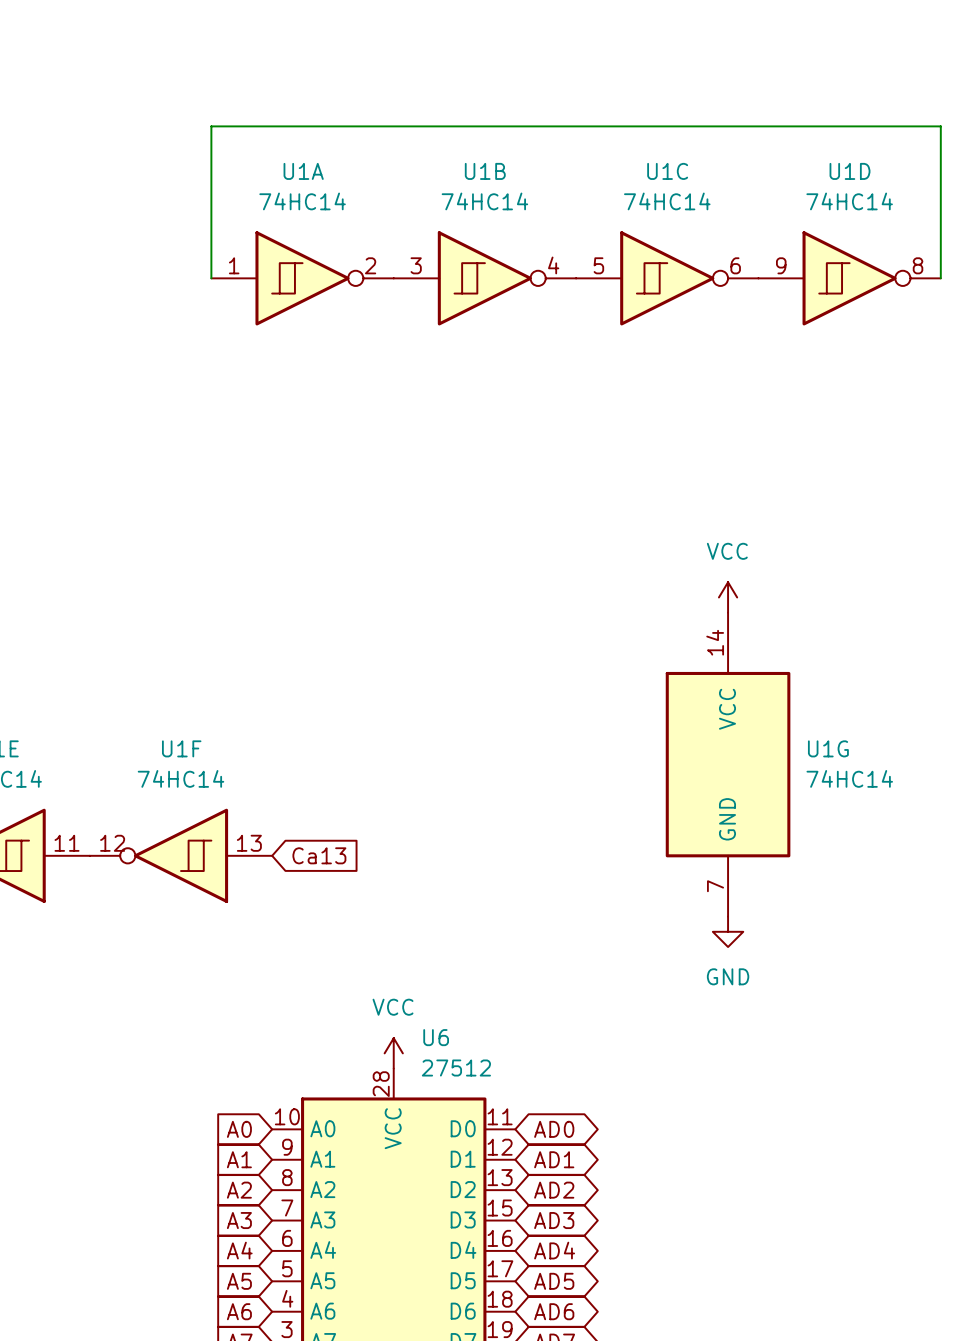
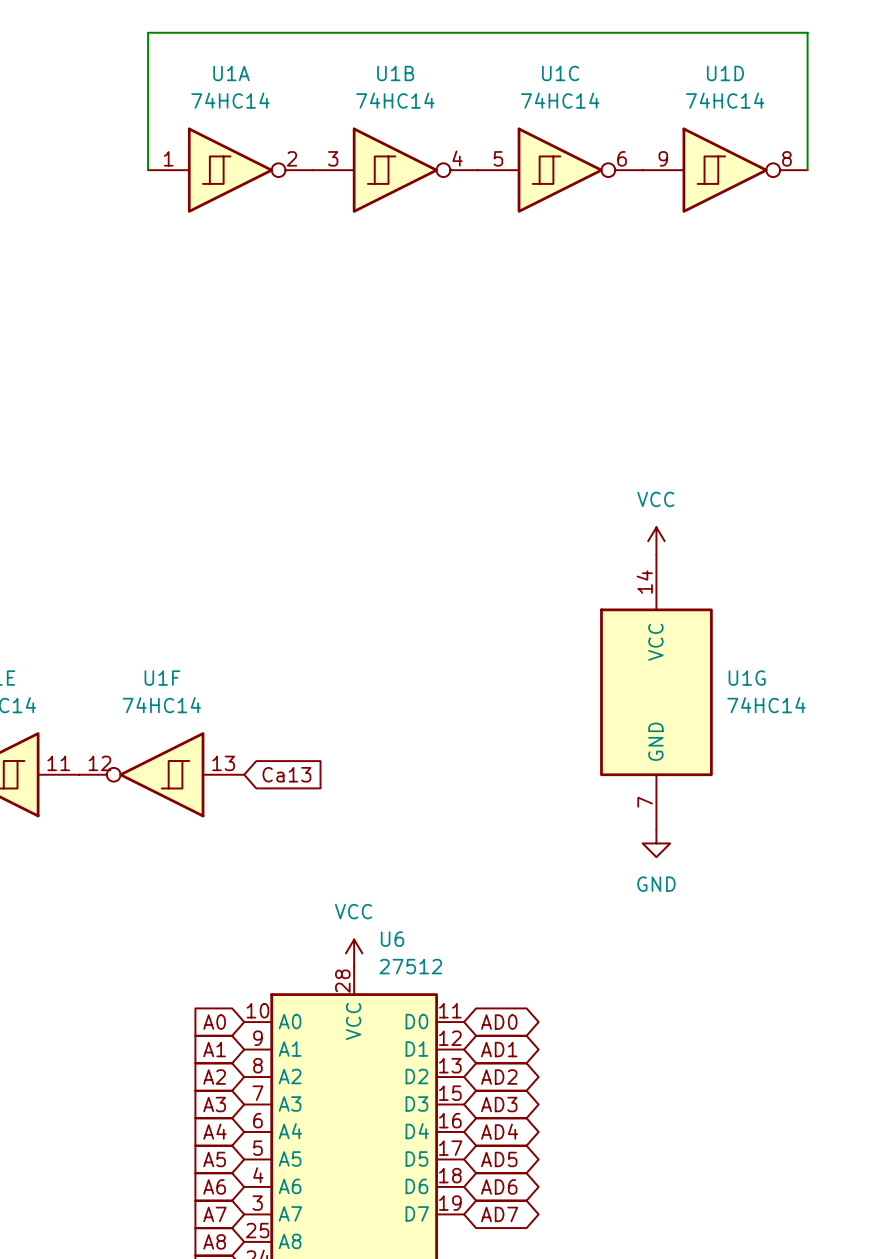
wire: (211, 278) (211, 126) (940, 126) (940, 278) -> (148, 170) (148, 32) (807, 32) (807, 170)
U1A position: (302, 278) -> (230, 170)
U1B position: (484, 278) -> (395, 170)
U1C position: (667, 278) -> (560, 170)
U1D position: (849, 278) -> (725, 170)

